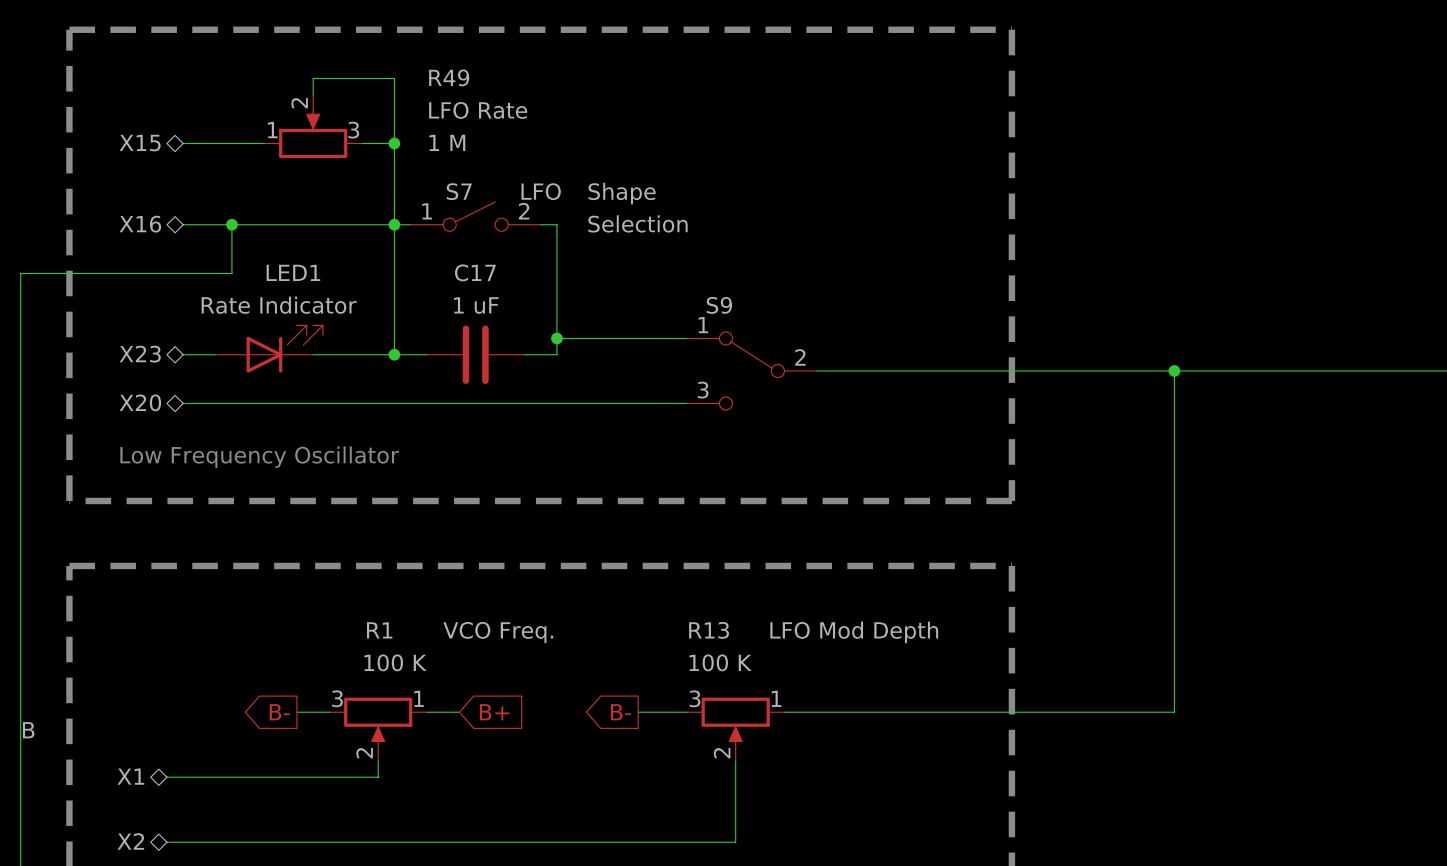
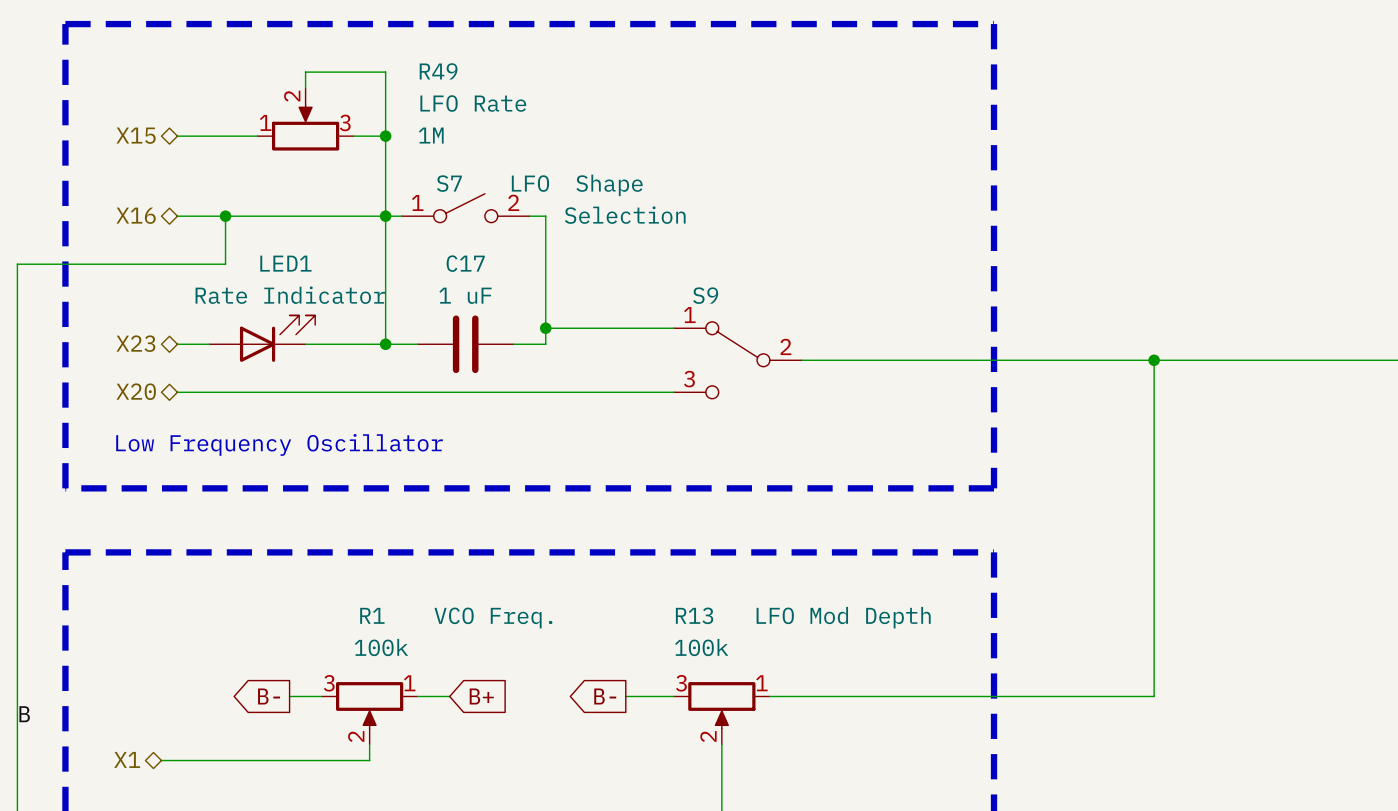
R49 value: 1 M (447, 142) -> 1M (431, 135)
R1 value: 100 K (395, 662) -> 100k (381, 647)
R13 value: 100 K (720, 662) -> 100k (701, 647)

